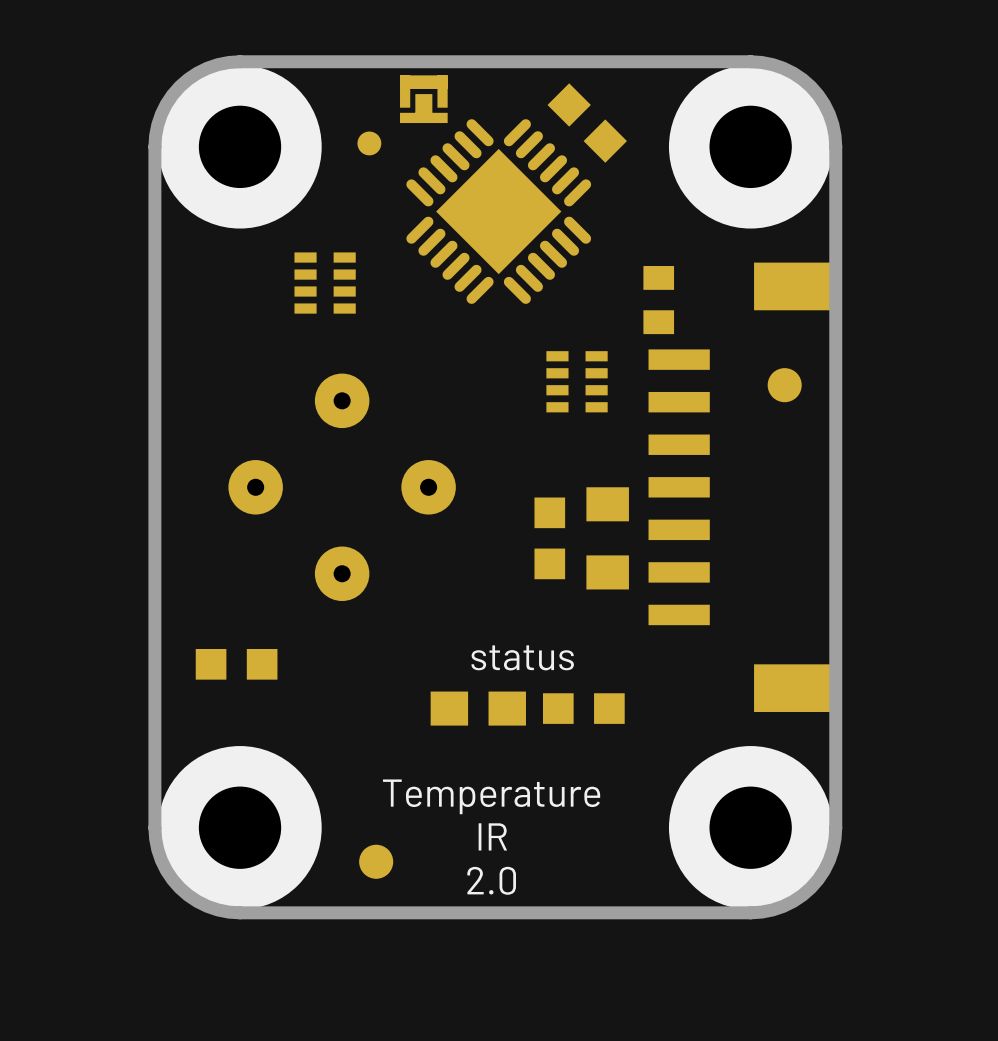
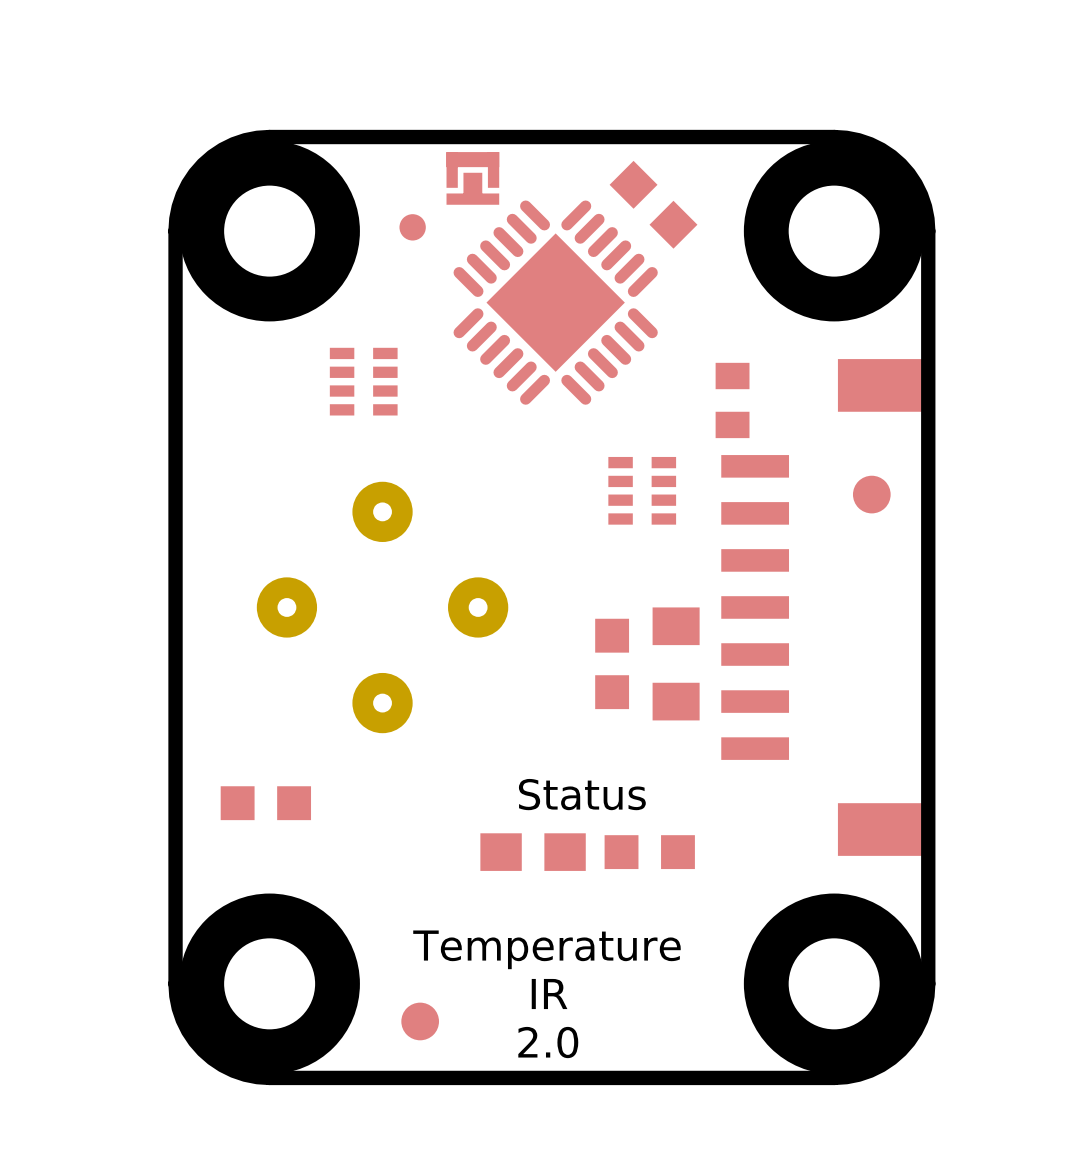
text: status (522, 657) -> Status (582, 794)

